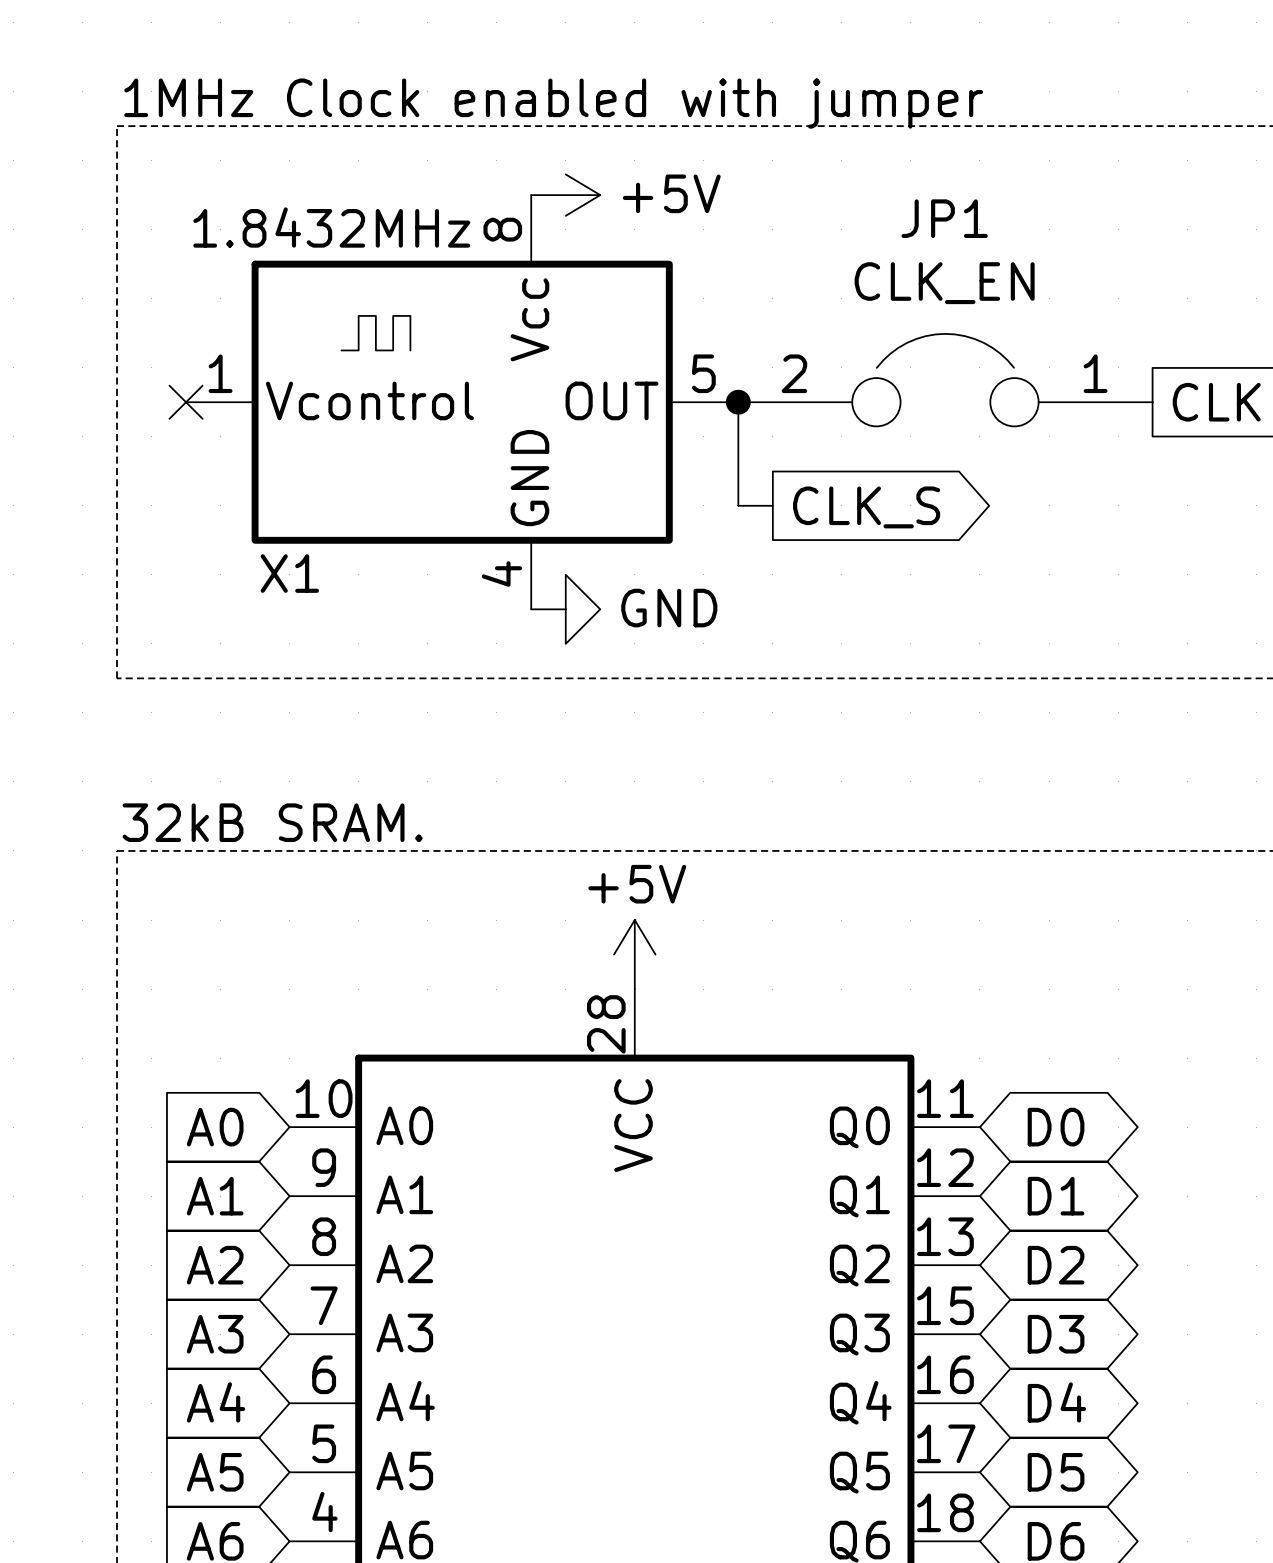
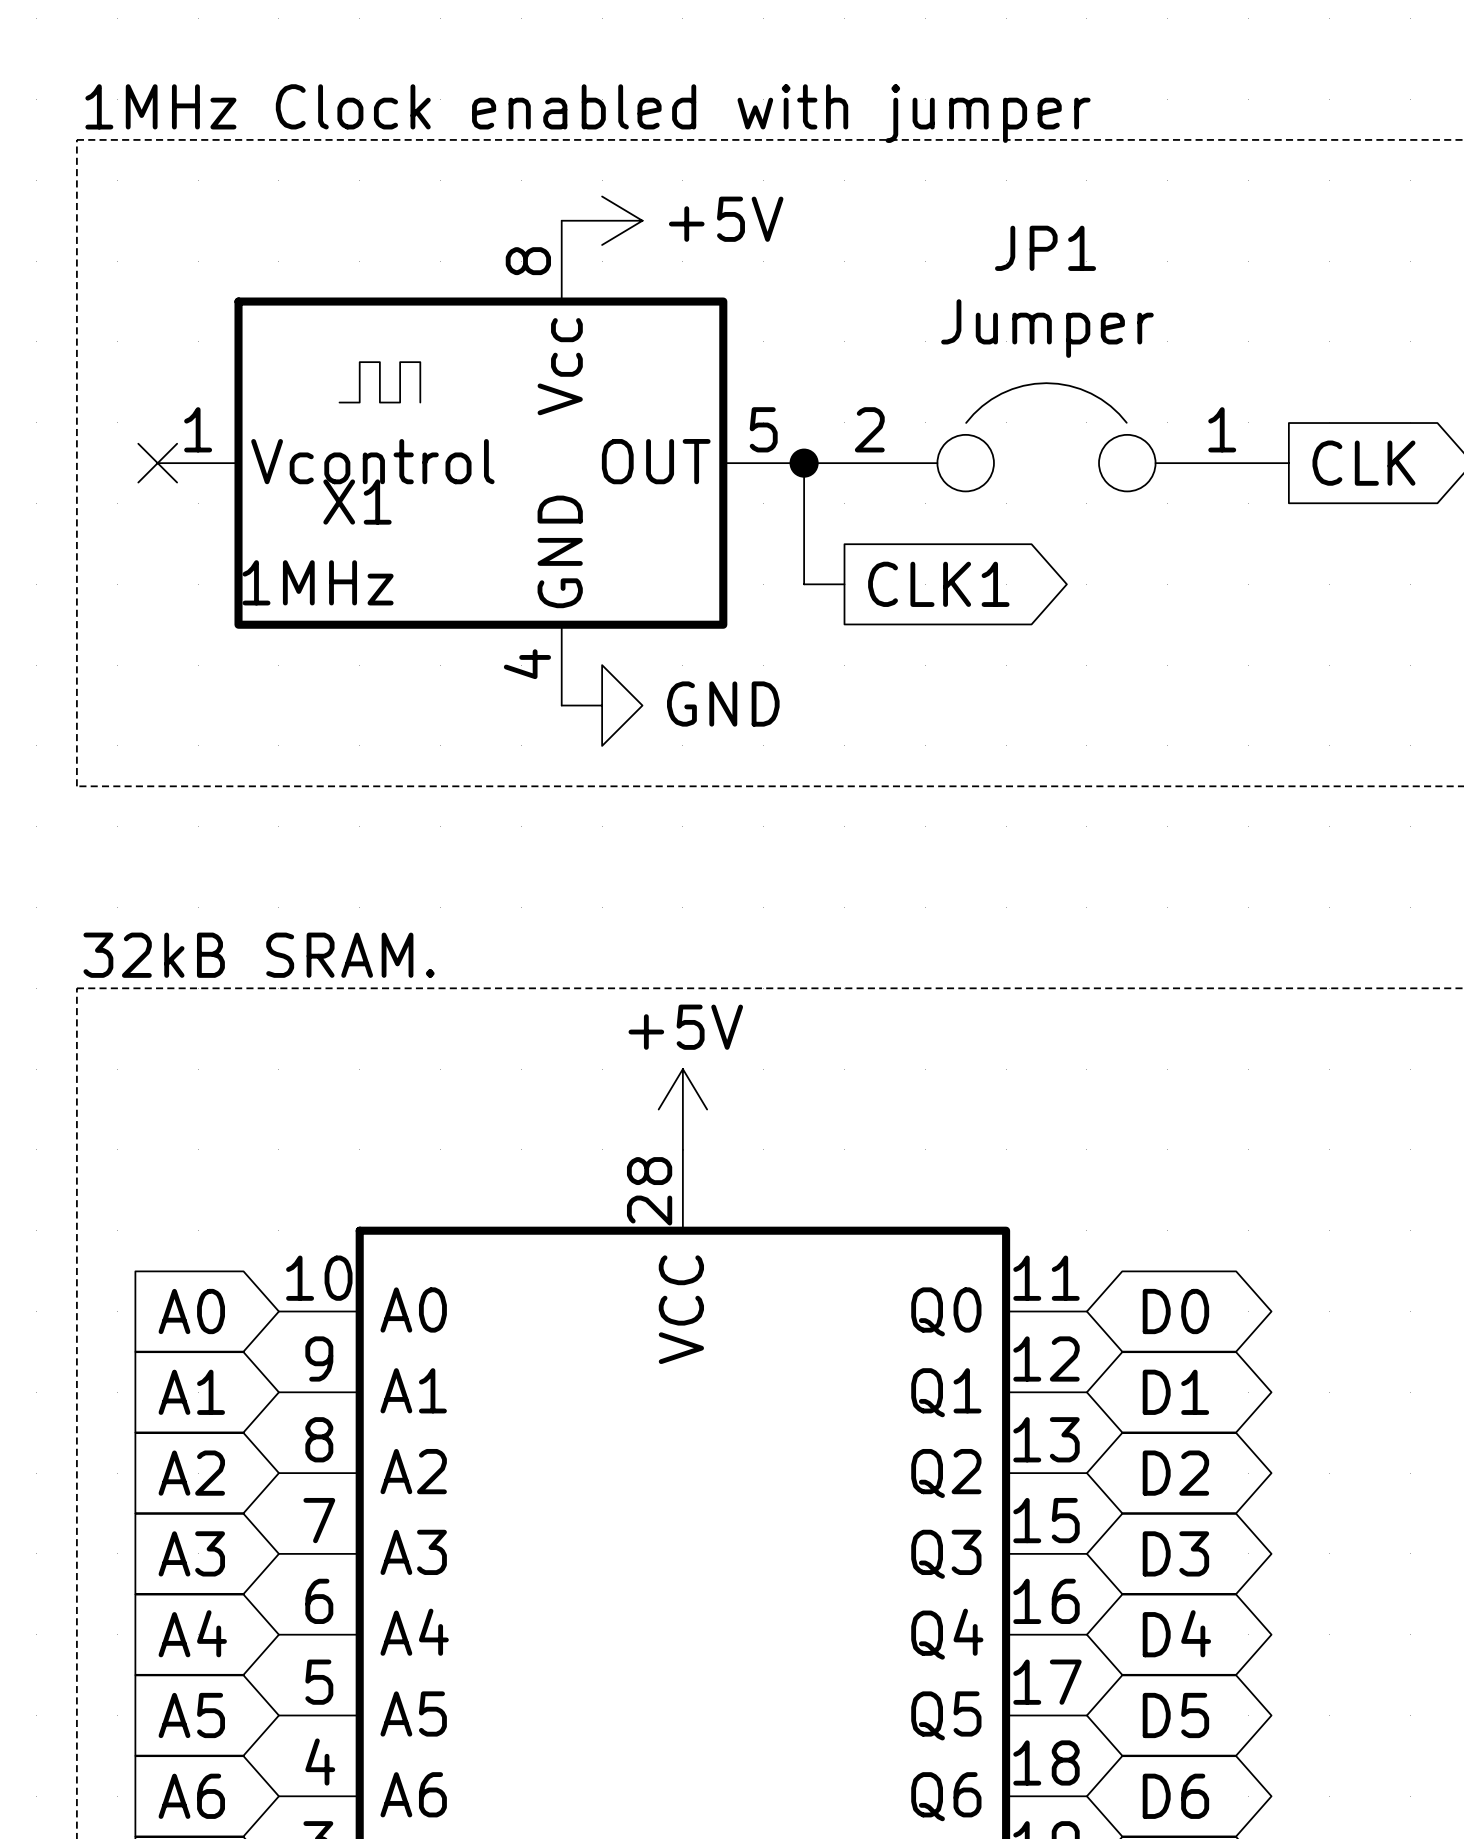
X1 value: 1.8432MHz (331, 227) -> 1MHz (318, 582)
JP1 value: CLK_EN (944, 283) -> Jumper (1047, 328)
global label: CLK_S (866, 507) -> CLK1 (938, 584)
X1 name position: X1 (289, 573) -> X1 (357, 502)

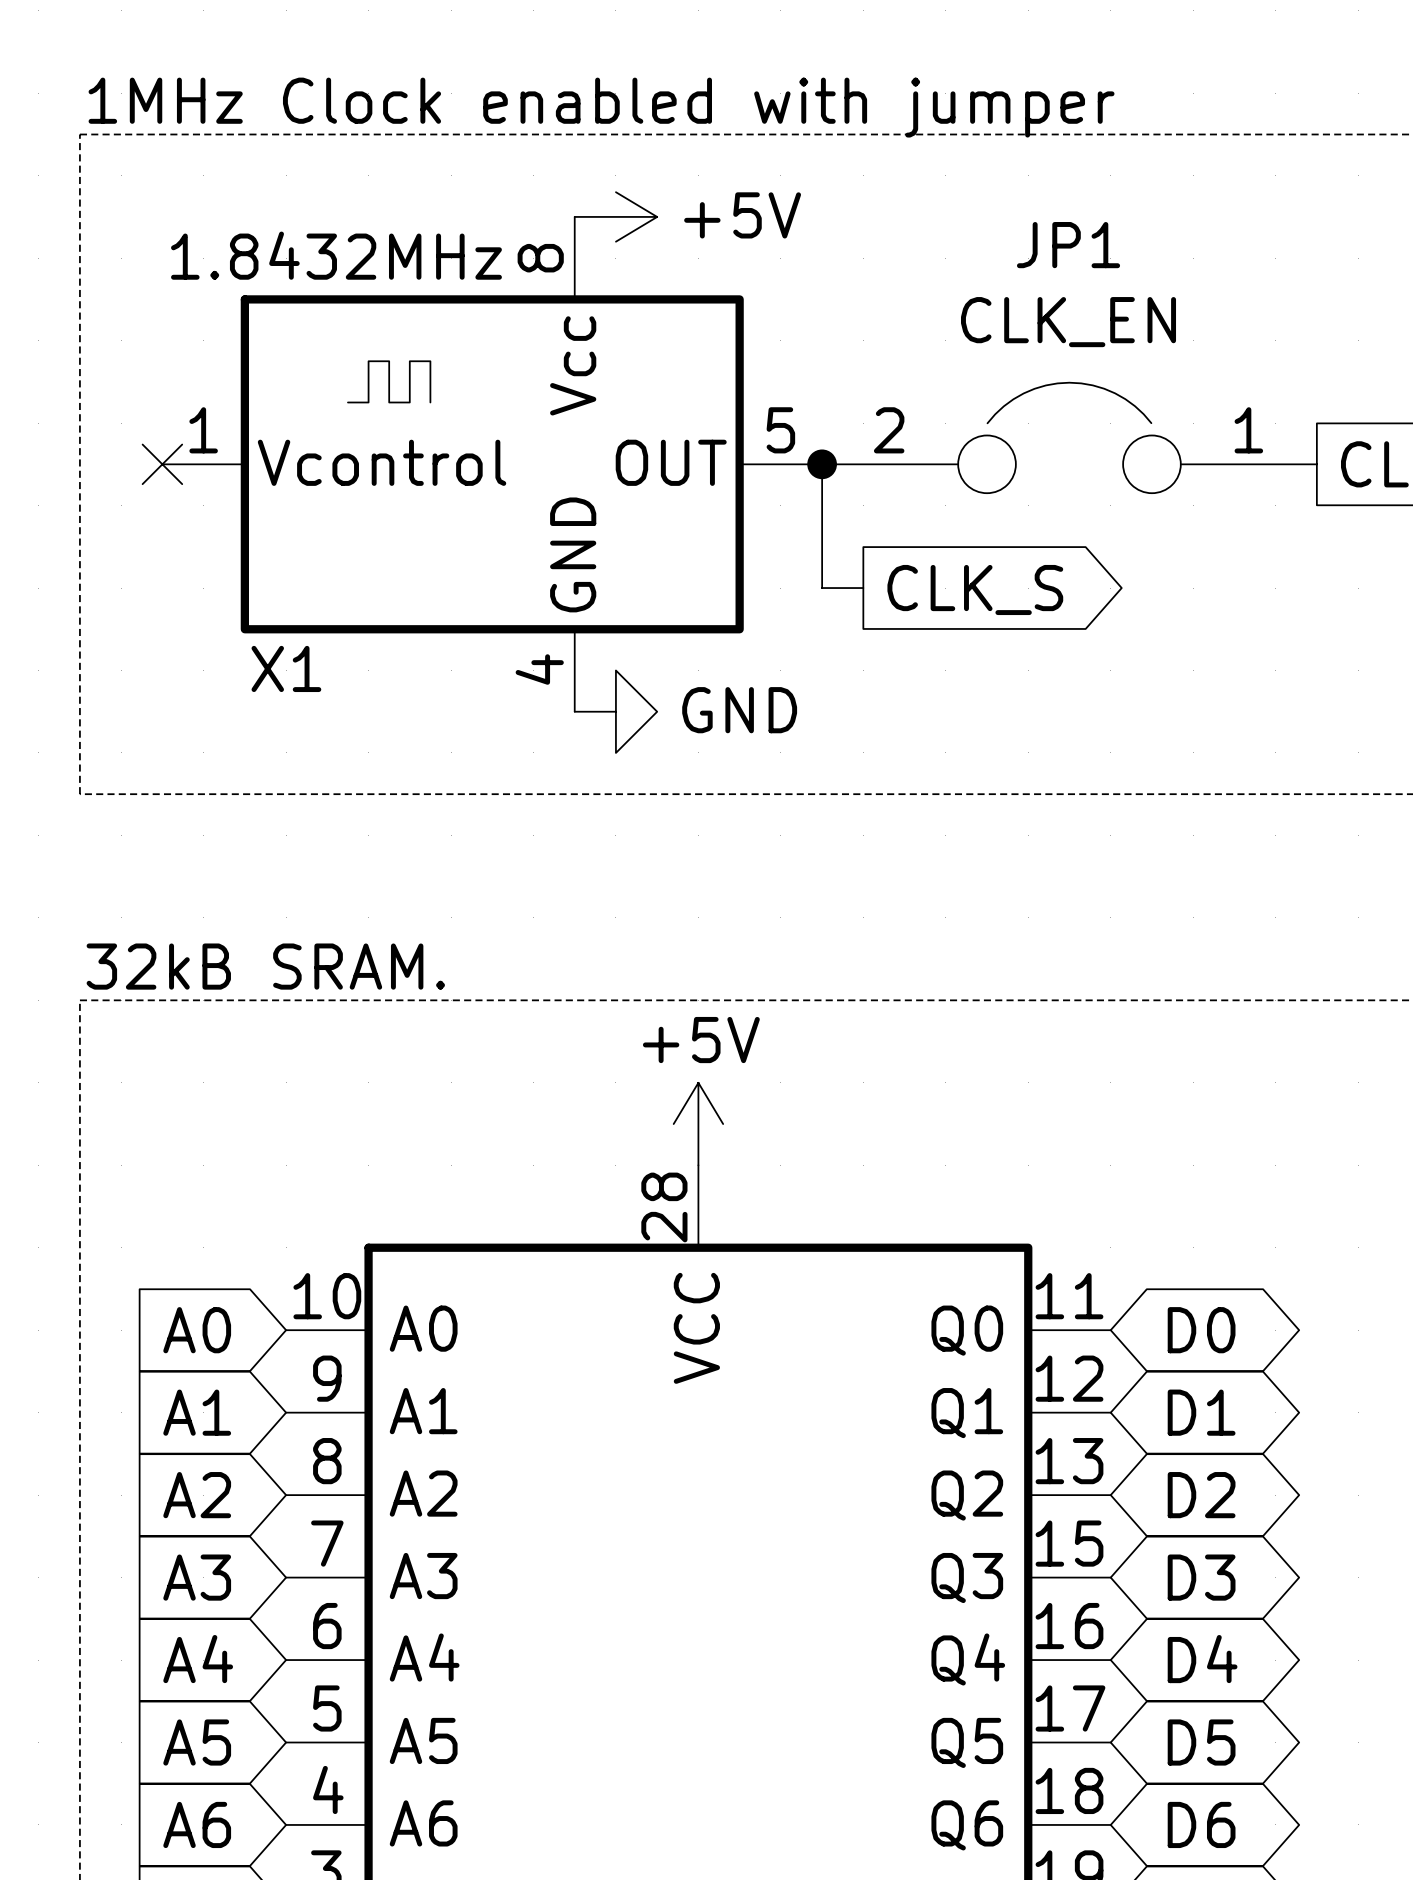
JP1 value: Jumper (1047, 328) -> CLK_EN (1068, 322)
X1 name position: X1 (357, 502) -> X1 (286, 668)
X1 value: 1MHz (318, 582) -> 1.8432MHz (336, 255)
global label: CLK1 (938, 584) -> CLK_S (975, 589)

